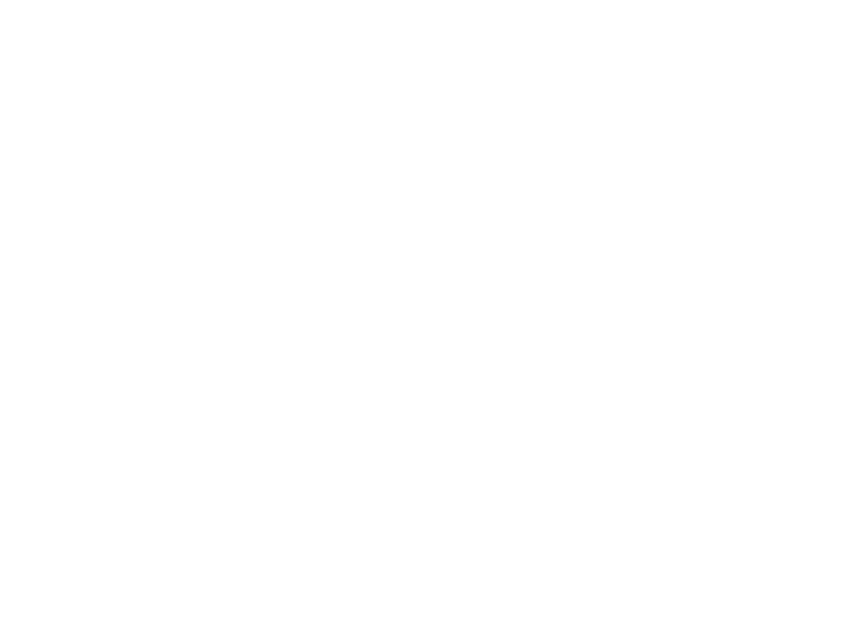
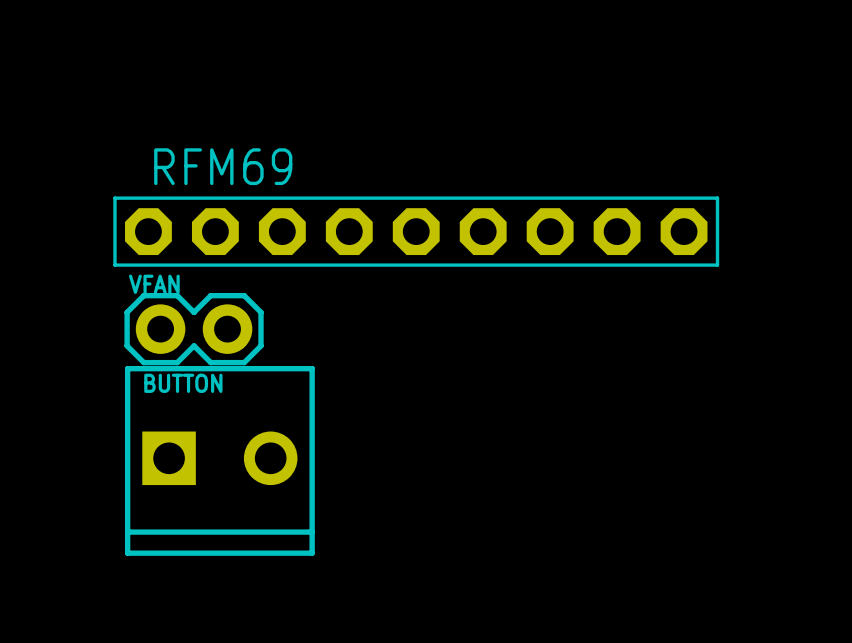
RFM69: none -> (416, 231)
VFAN: none -> (194, 329)
BUTTON: none -> (219, 460)

